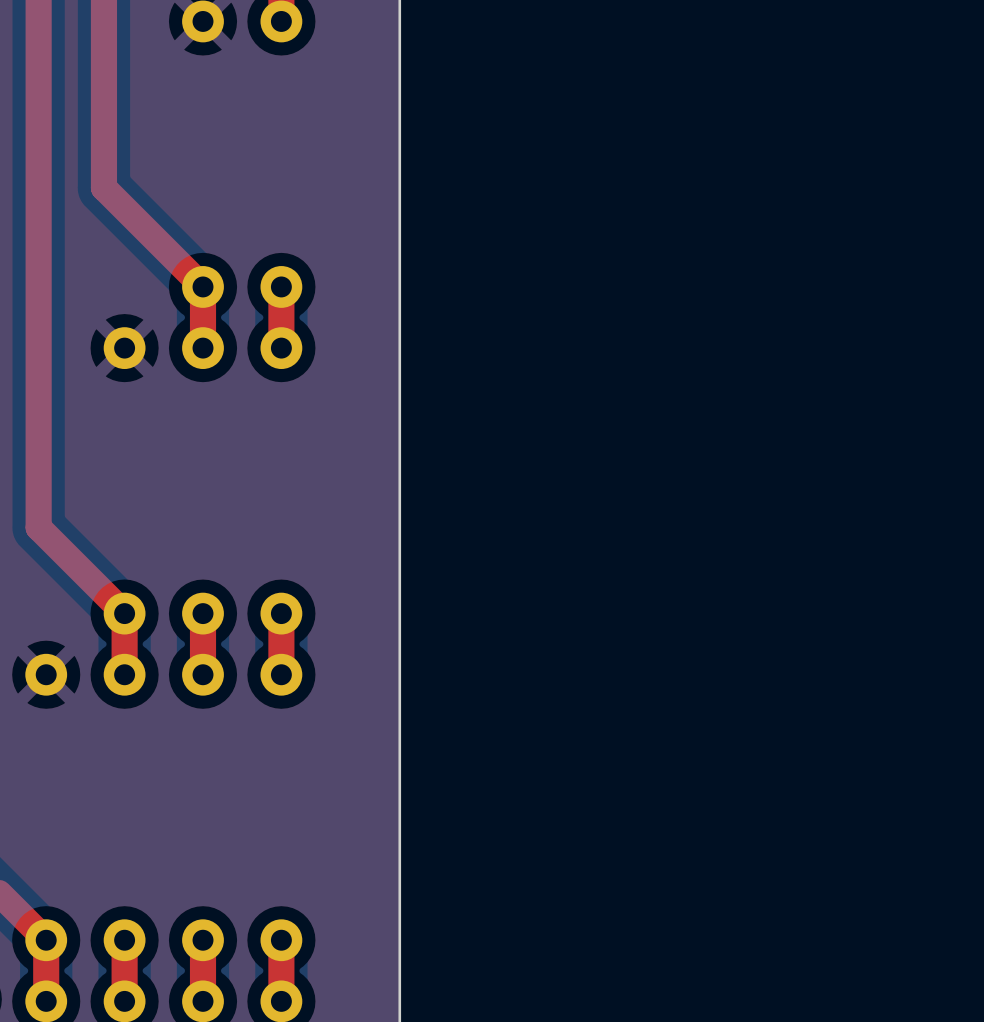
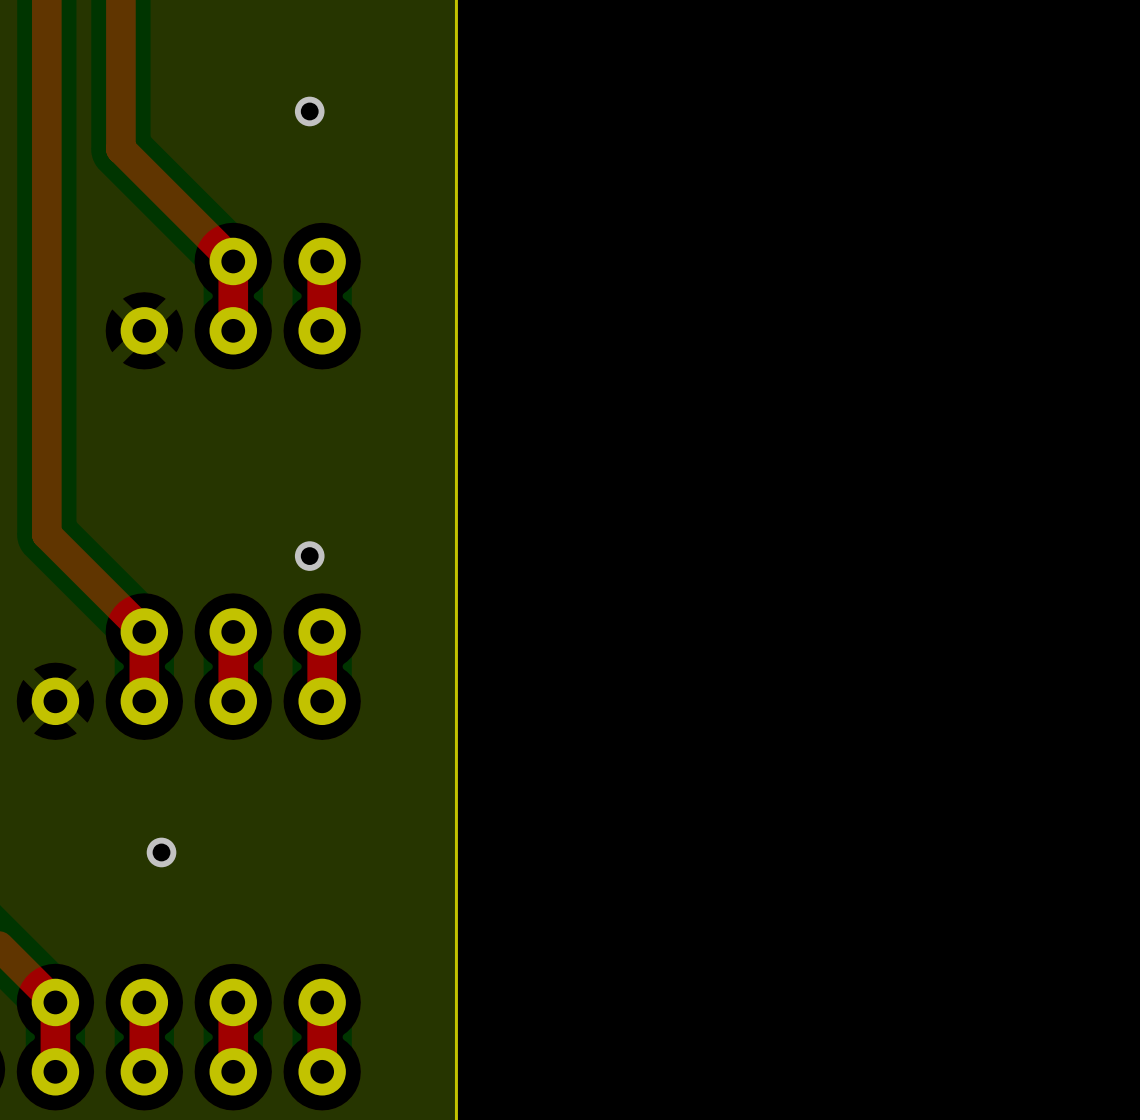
via: none -> (309, 111)
via: none -> (309, 556)
via: none -> (161, 852)

